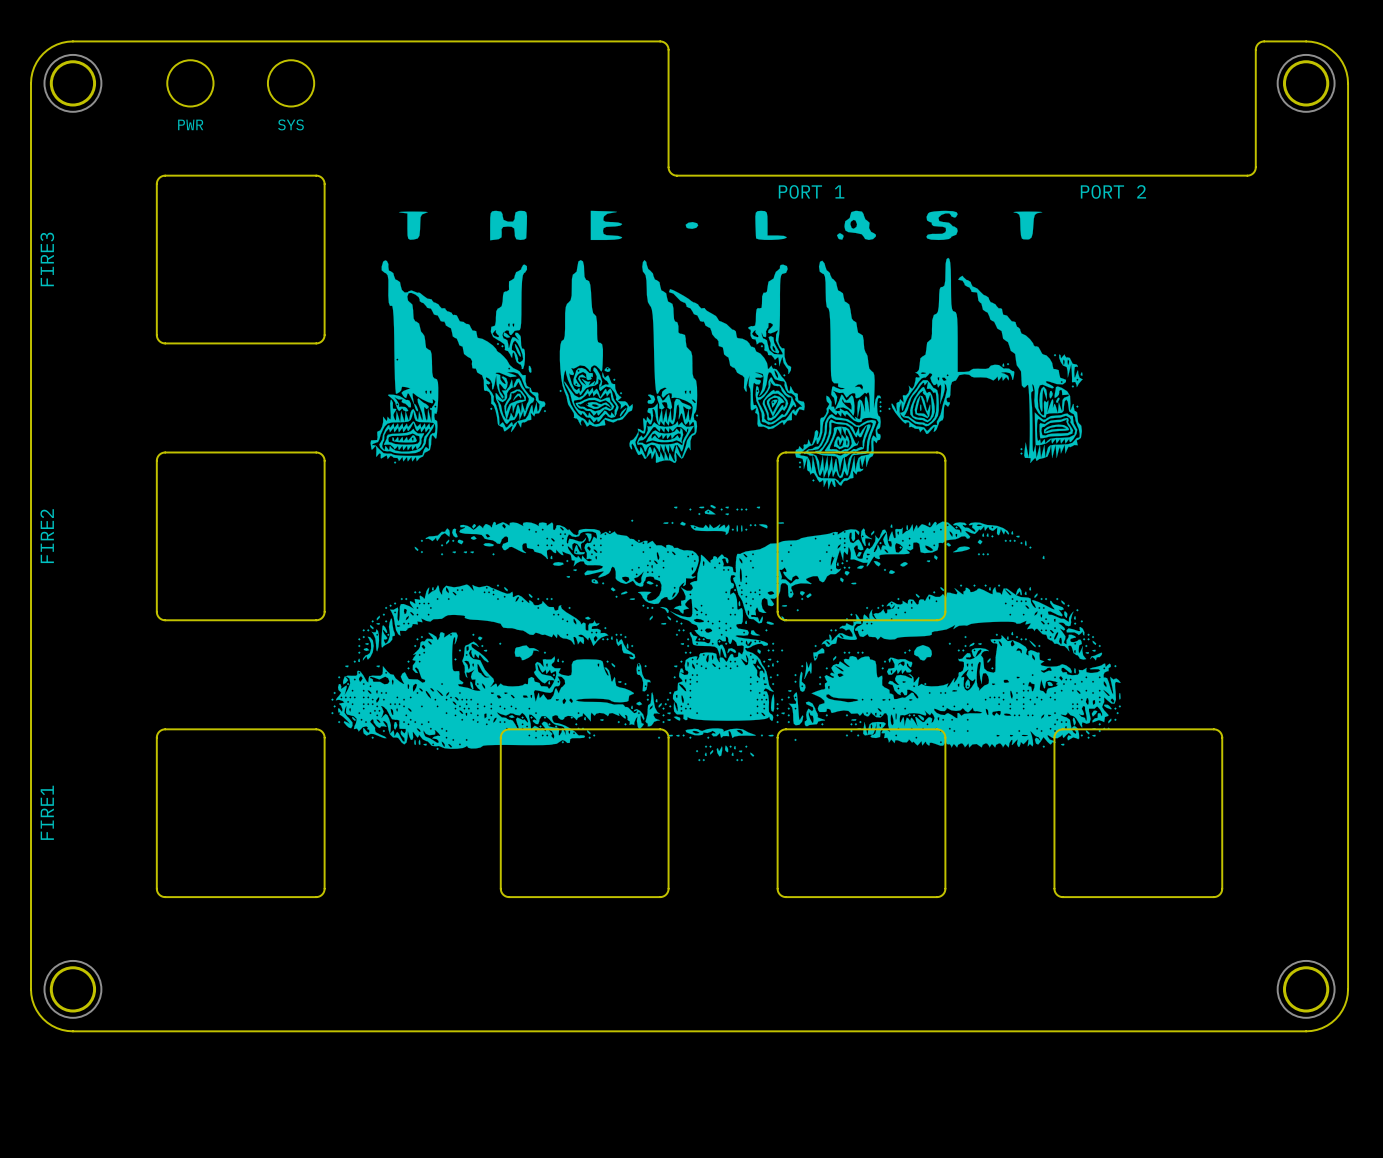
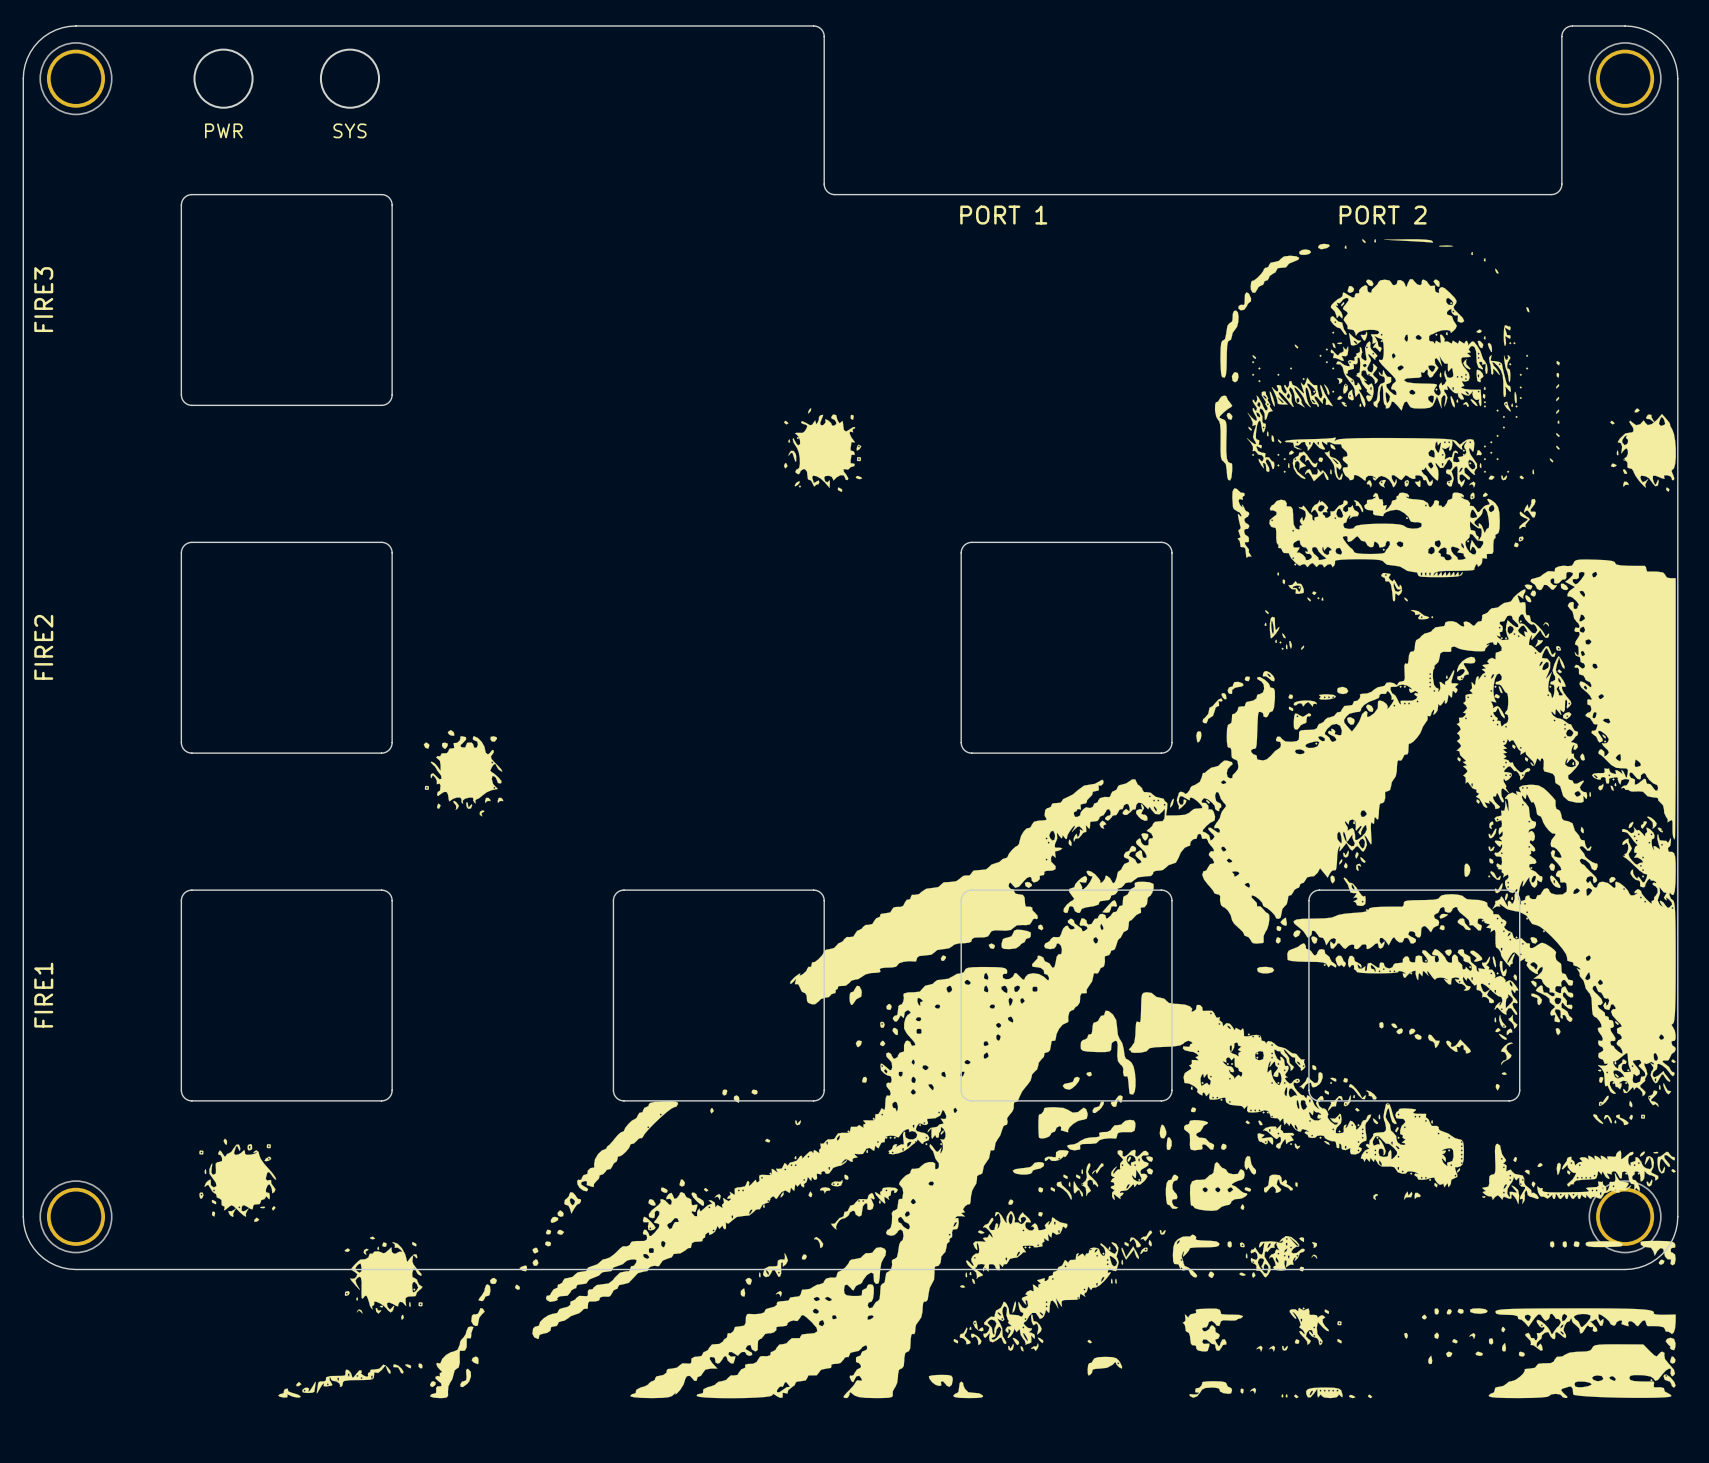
drawing: [331, 210, 1122, 762] -> none
drawing: none -> [199, 239, 1676, 1399]

